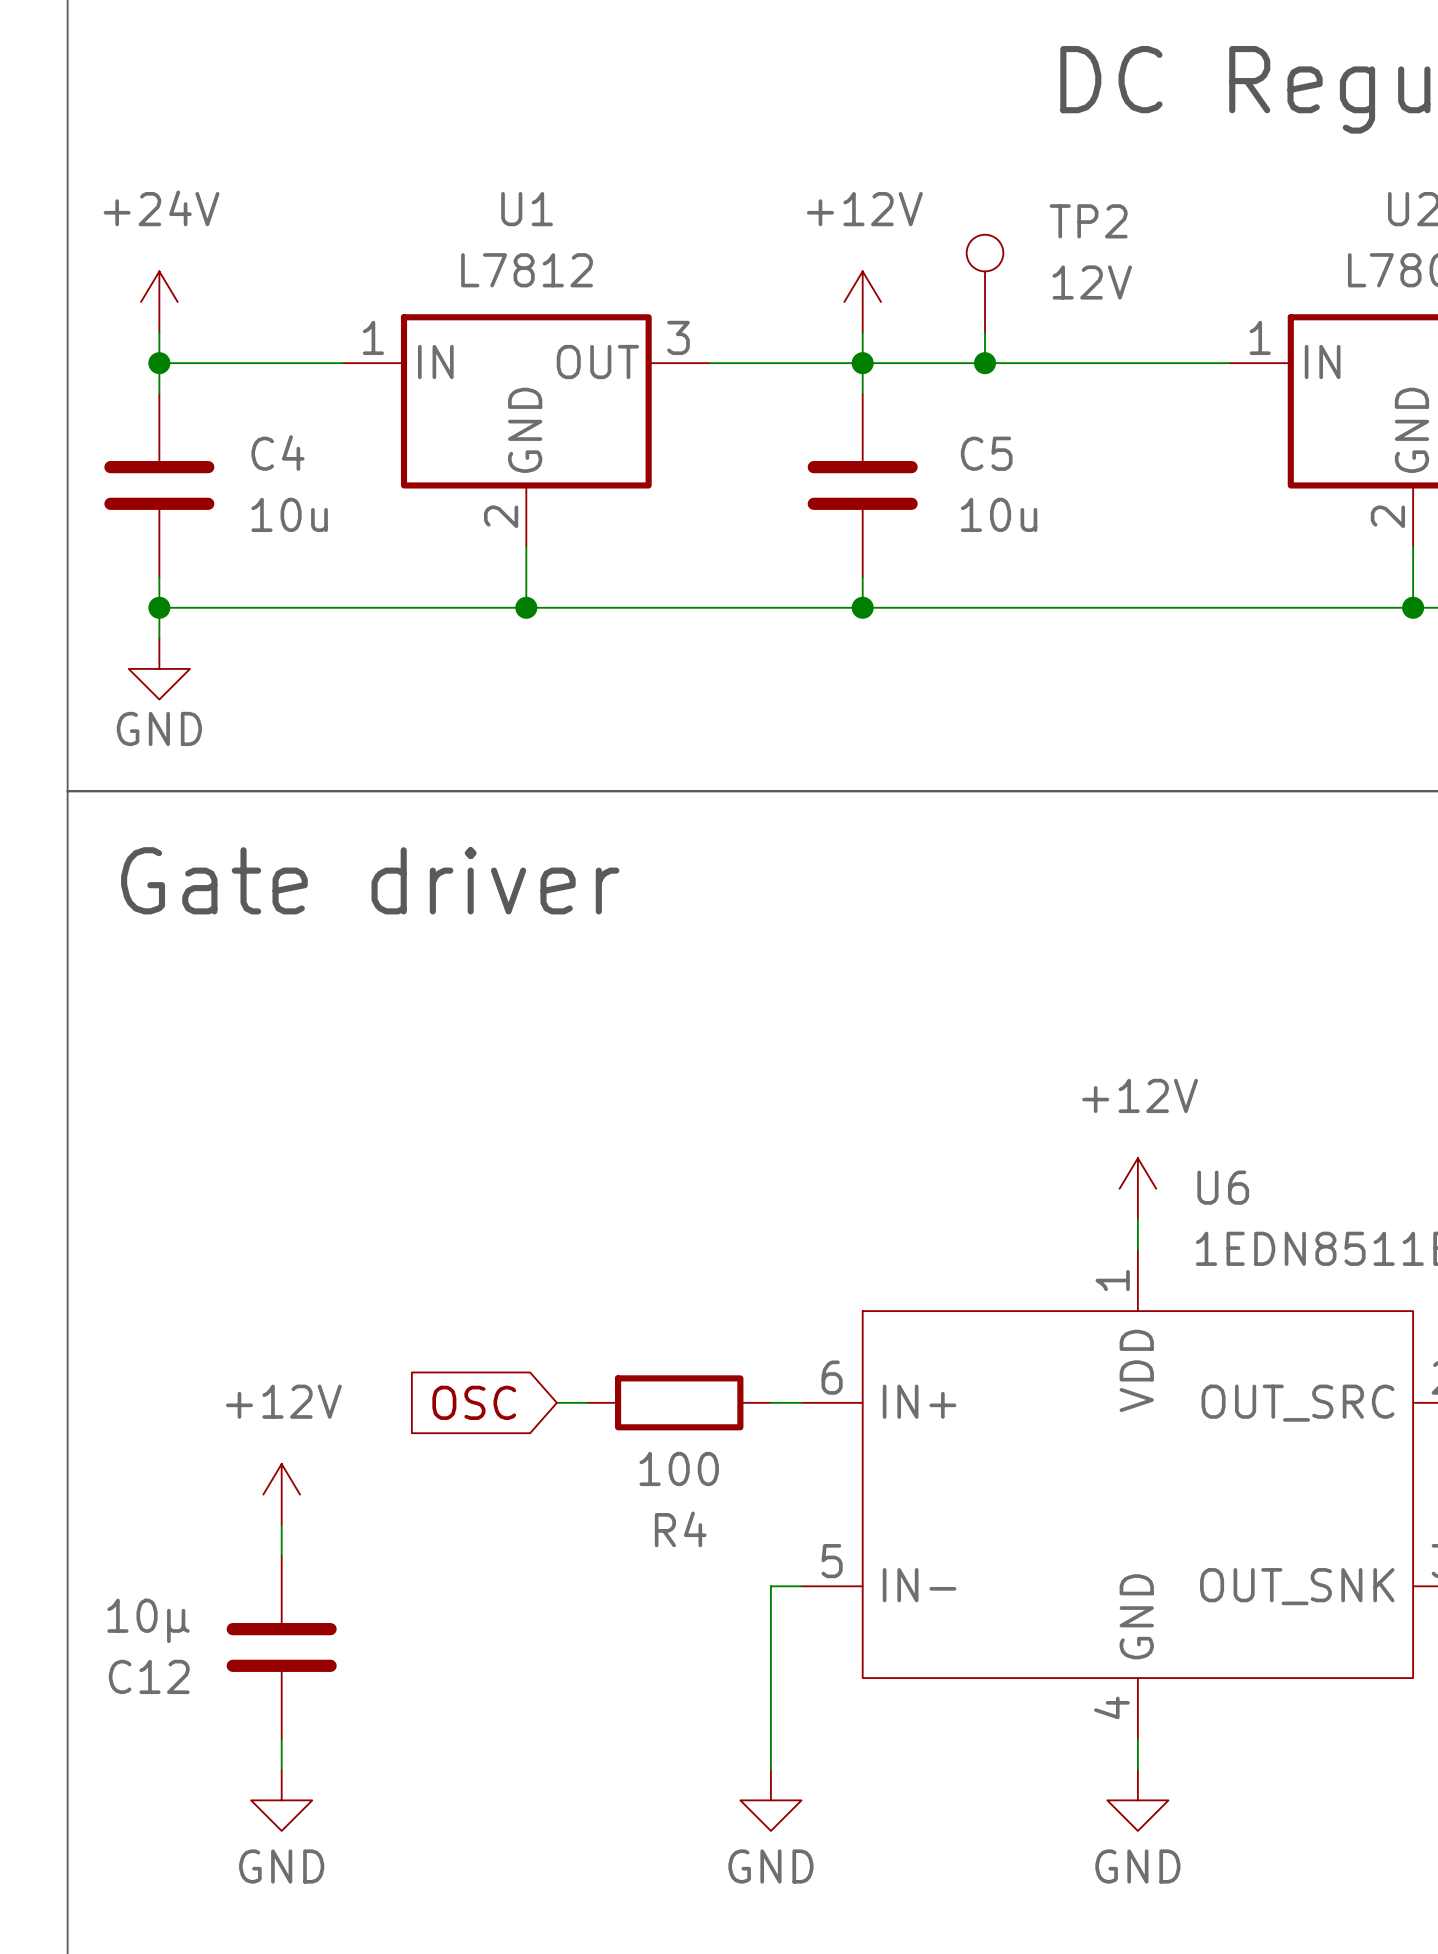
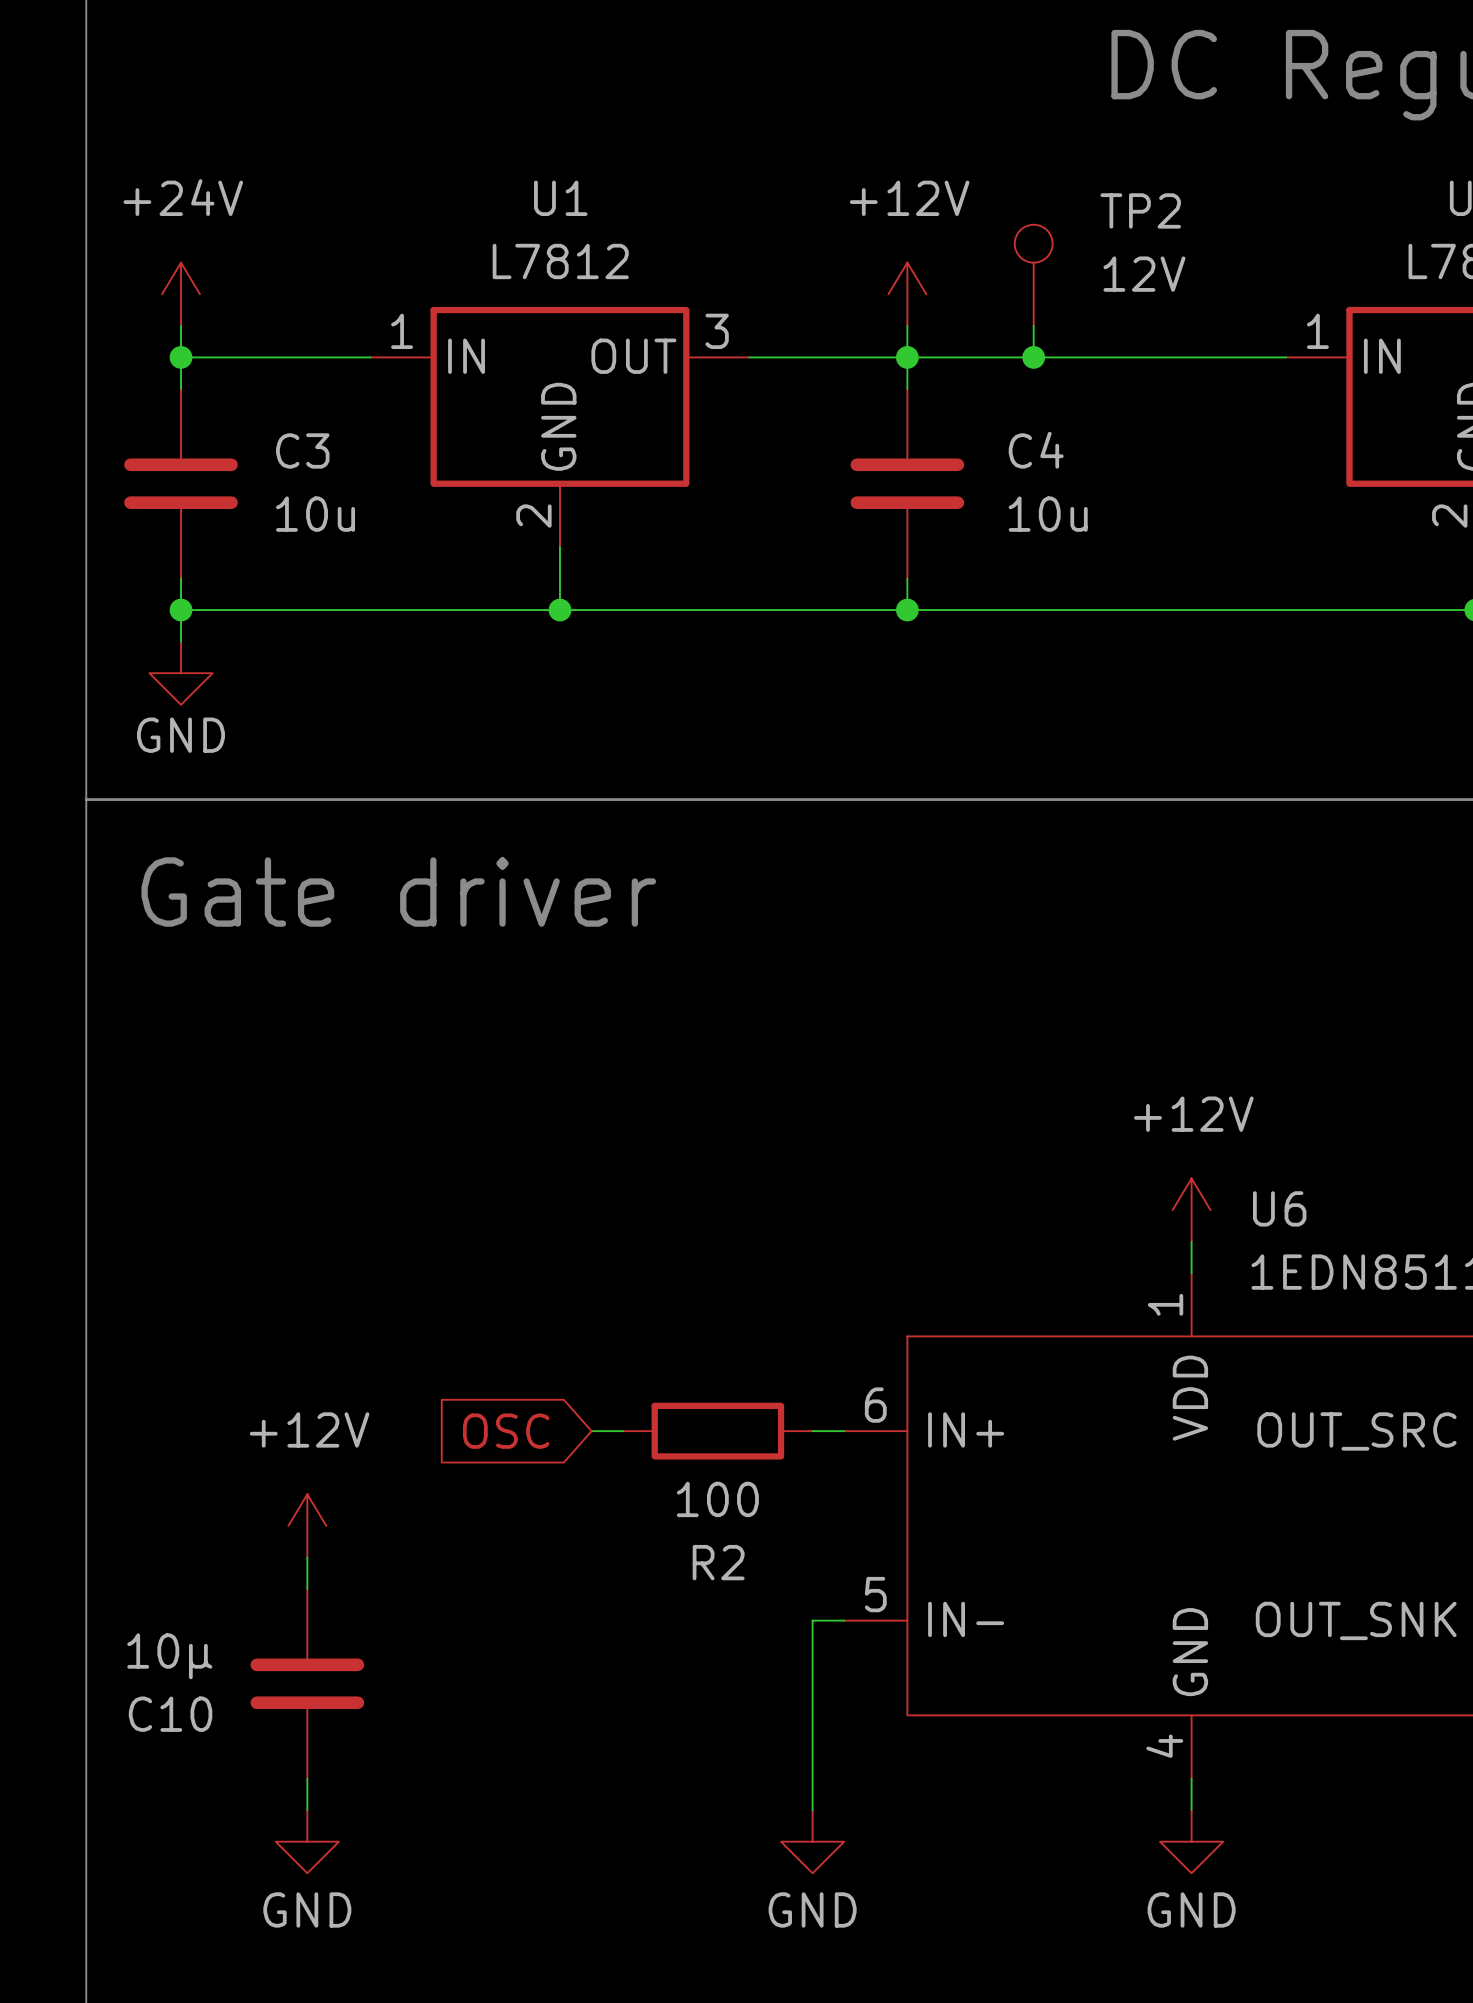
C4 name: C4 (277, 453) -> C3 (302, 450)
C5 name: C5 (986, 453) -> C4 (1036, 450)
R4 name: R4 (680, 1529) -> R2 (718, 1562)
C12 name: C12 (149, 1676) -> C10 (170, 1714)

